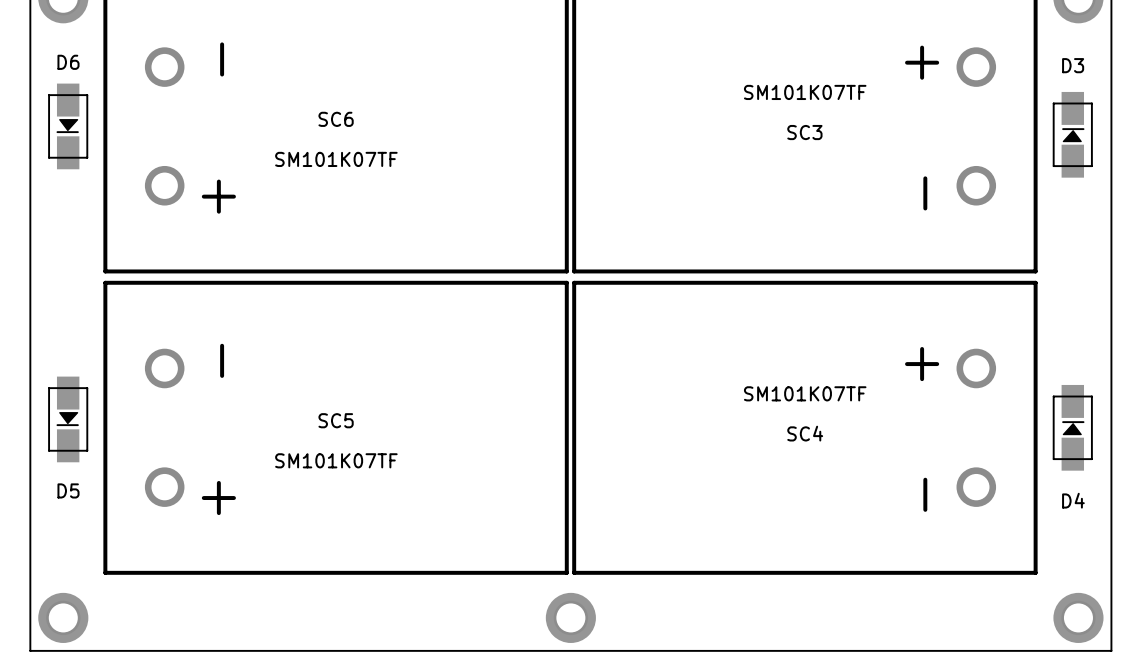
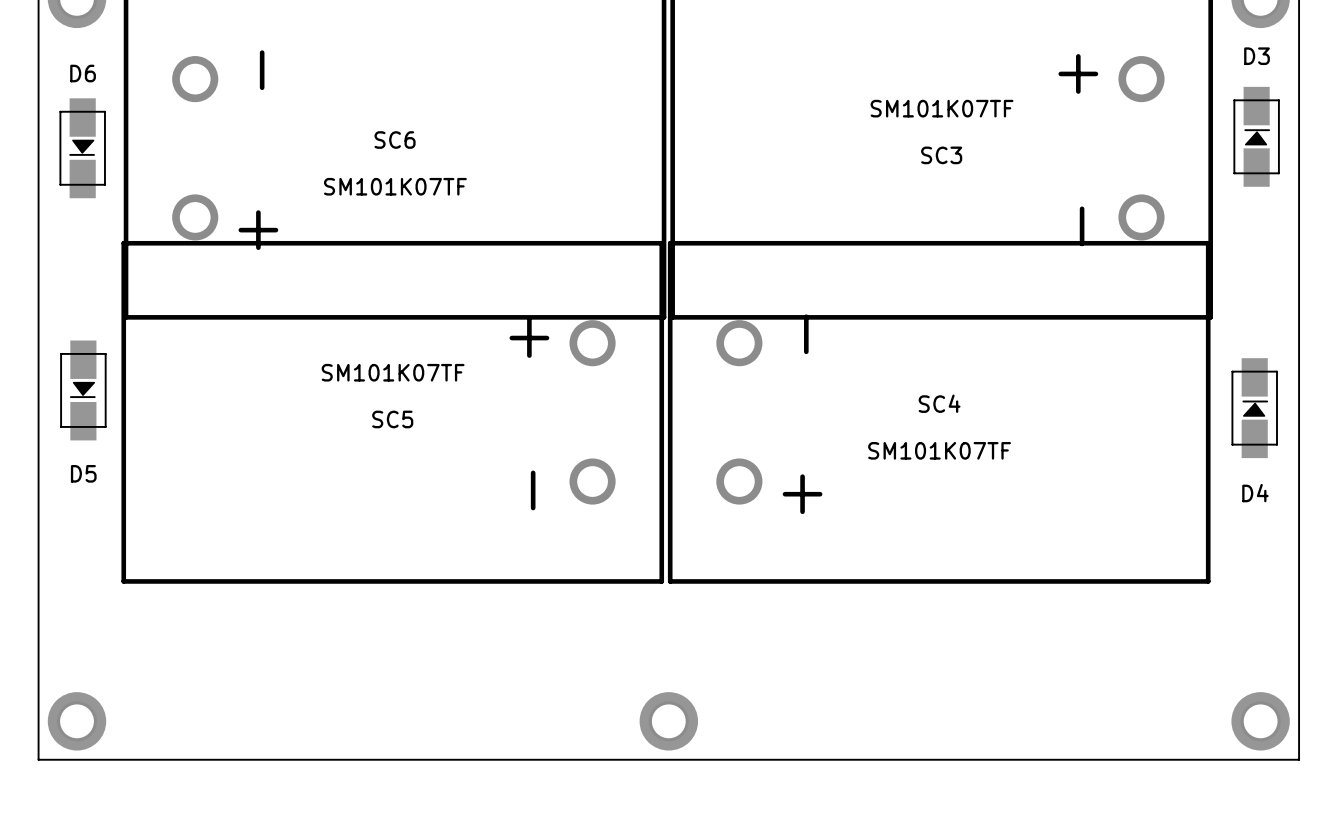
D3 position: (1072, 134) -> (1256, 136)
D5 position: (68, 419) -> (83, 390)
SC5 rotation: 0° (336, 427) -> 180° (392, 412)
SC4 rotation: 0° (804, 427) -> 180° (939, 412)
D4 position: (1072, 427) -> (1254, 408)

